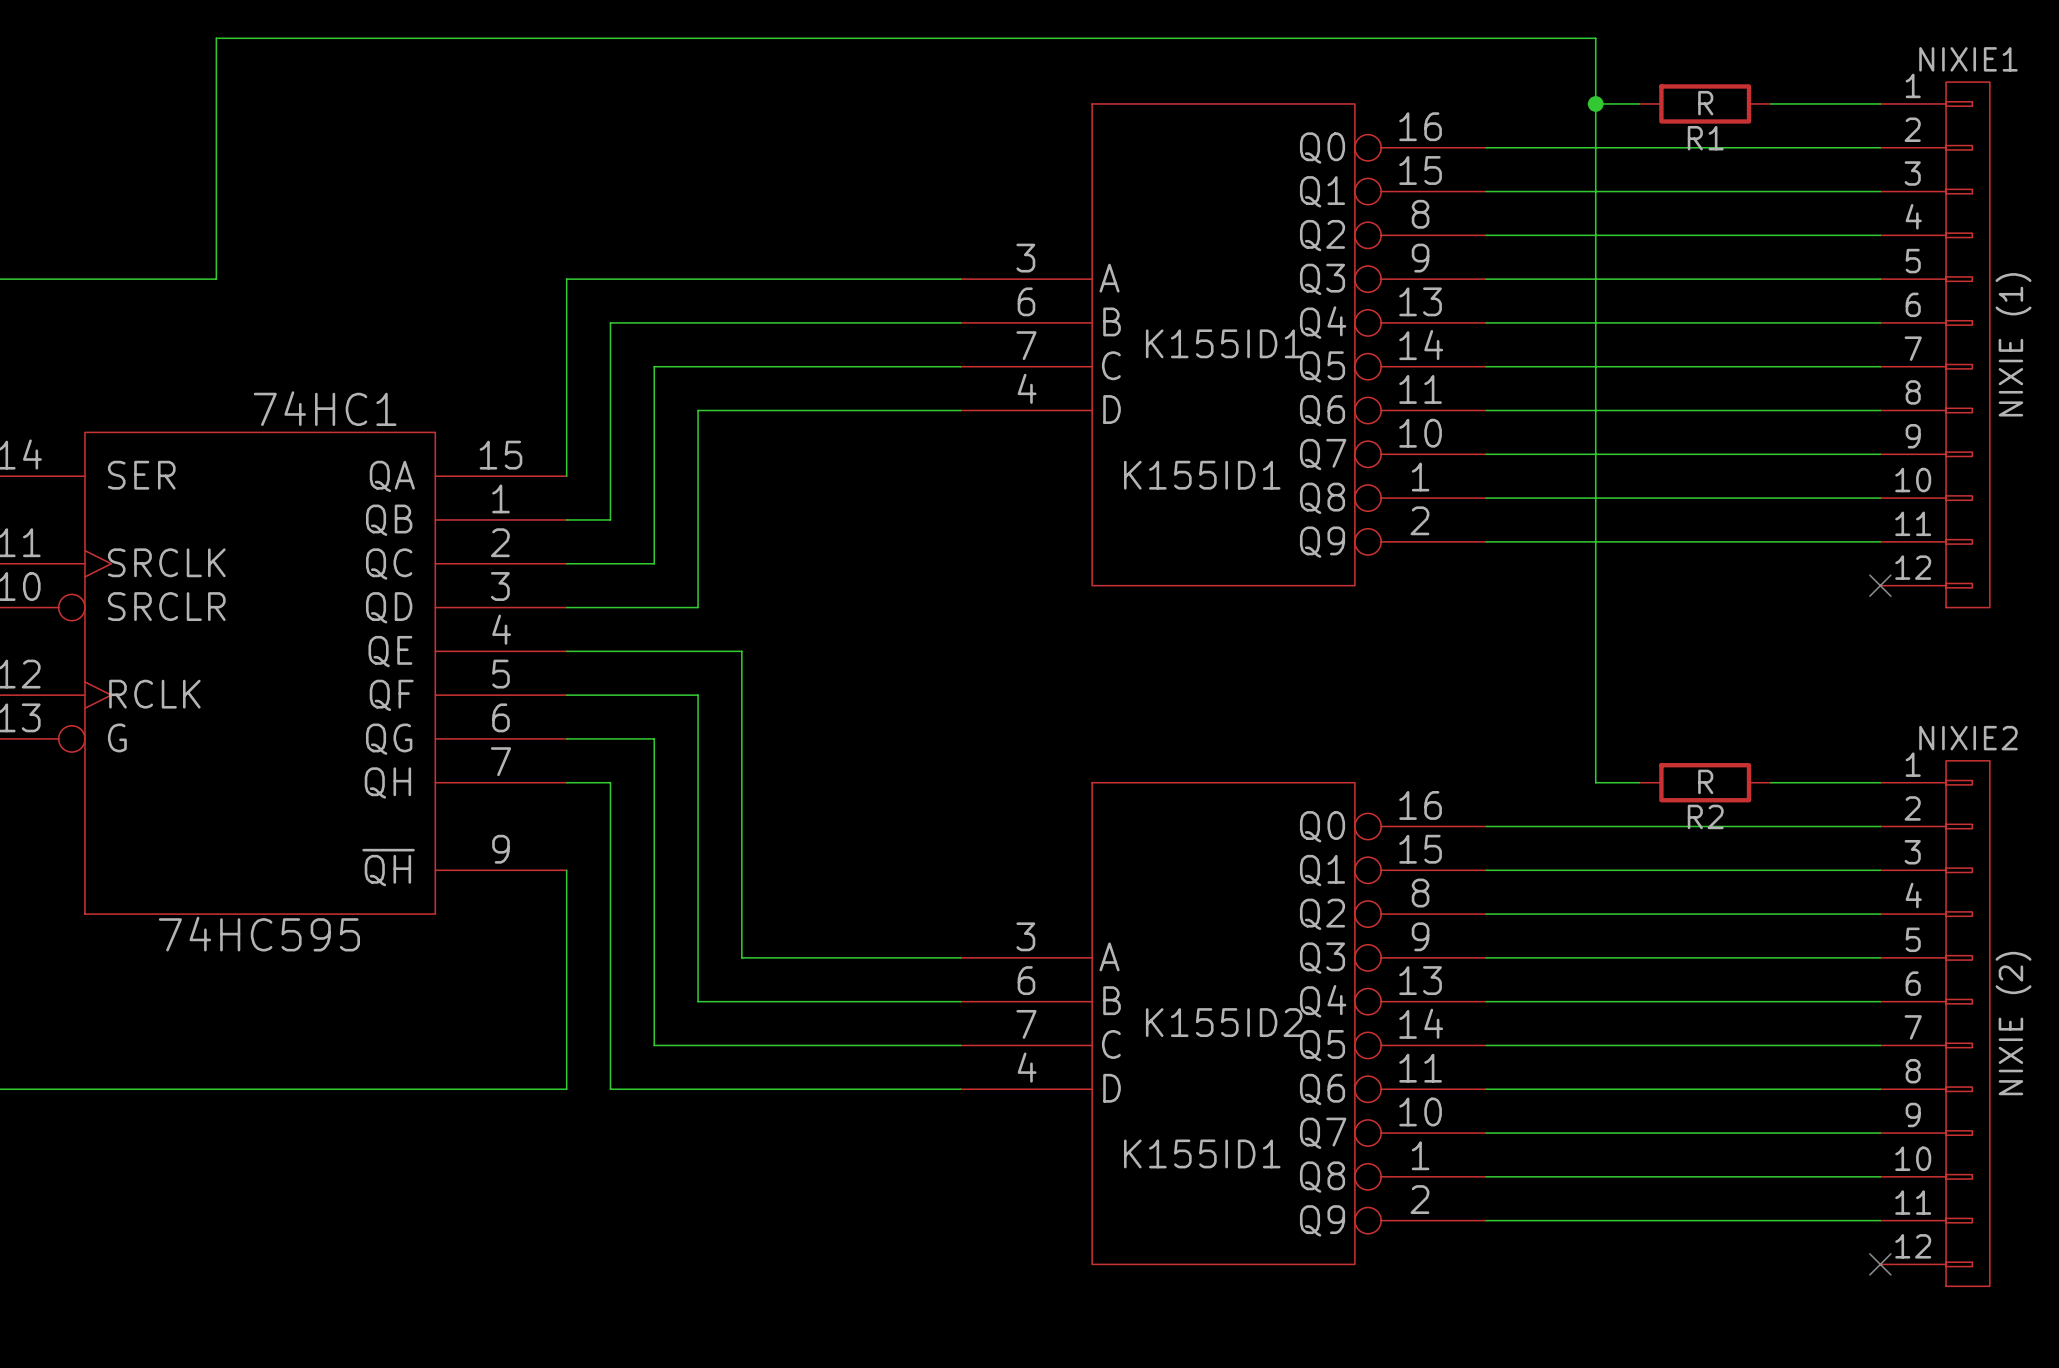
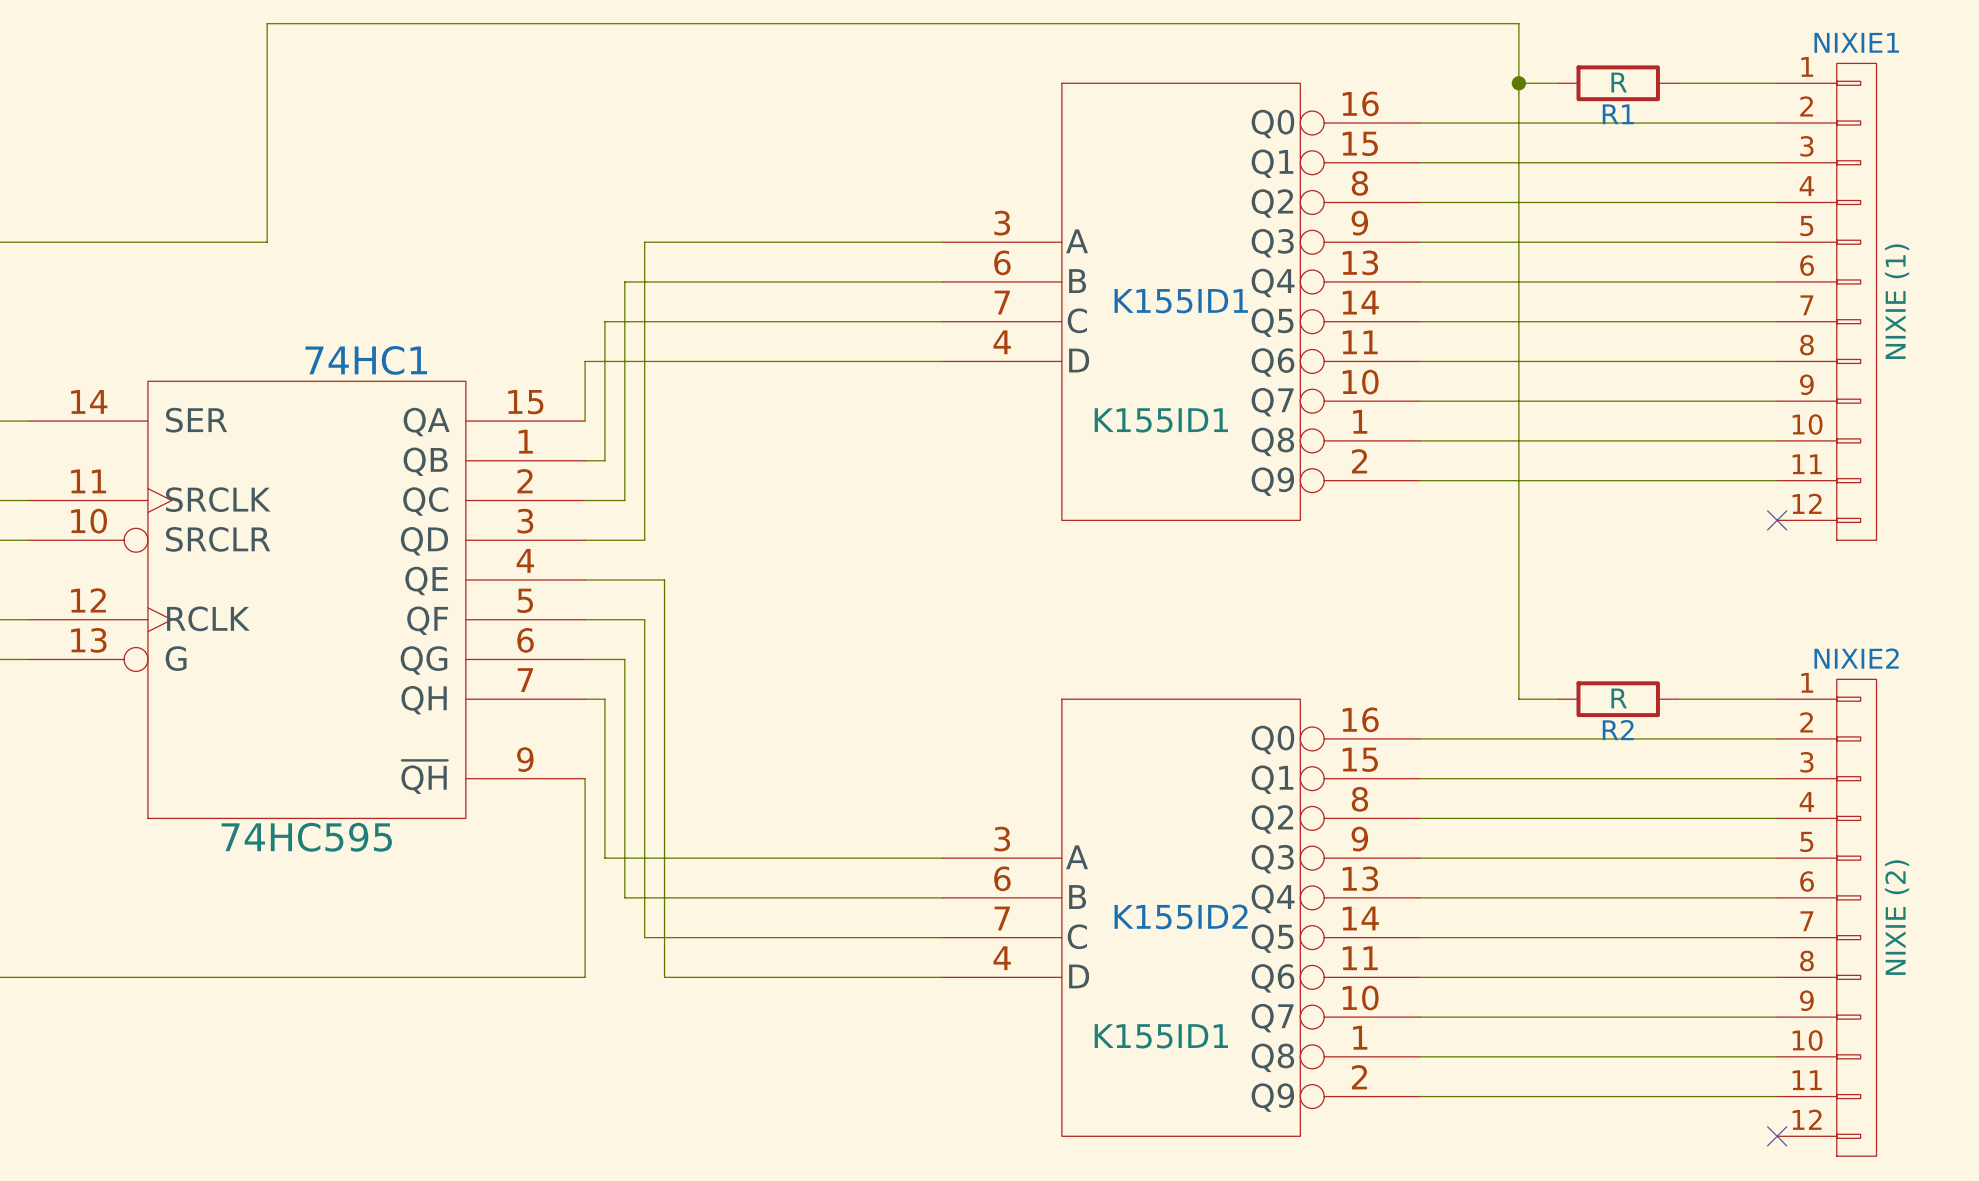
wire: (632, 279) (566, 279) (566, 410) -> (704, 361) (585, 361)
wire: (654, 366) (654, 563) (610, 563) -> (664, 321) (604, 321) (604, 460)
wire: (698, 410) (698, 607) (632, 607) -> (644, 242) (644, 540)
wire: (588, 519) (610, 519) -> (624, 500) (624, 460)
wire: (654, 651) (741, 651) (741, 957) -> (604, 699) (604, 858) (744, 858)
wire: (632, 695) (698, 695) (698, 1001) -> (644, 619) (644, 937) (664, 937) (664, 977)
wire: (610, 738) (654, 738) -> (664, 579) (664, 659)
wire: (588, 782) (610, 782) -> (624, 659) (624, 699)
wire: (610, 1001) (610, 1089) (654, 1089) -> (624, 897) (704, 897)

